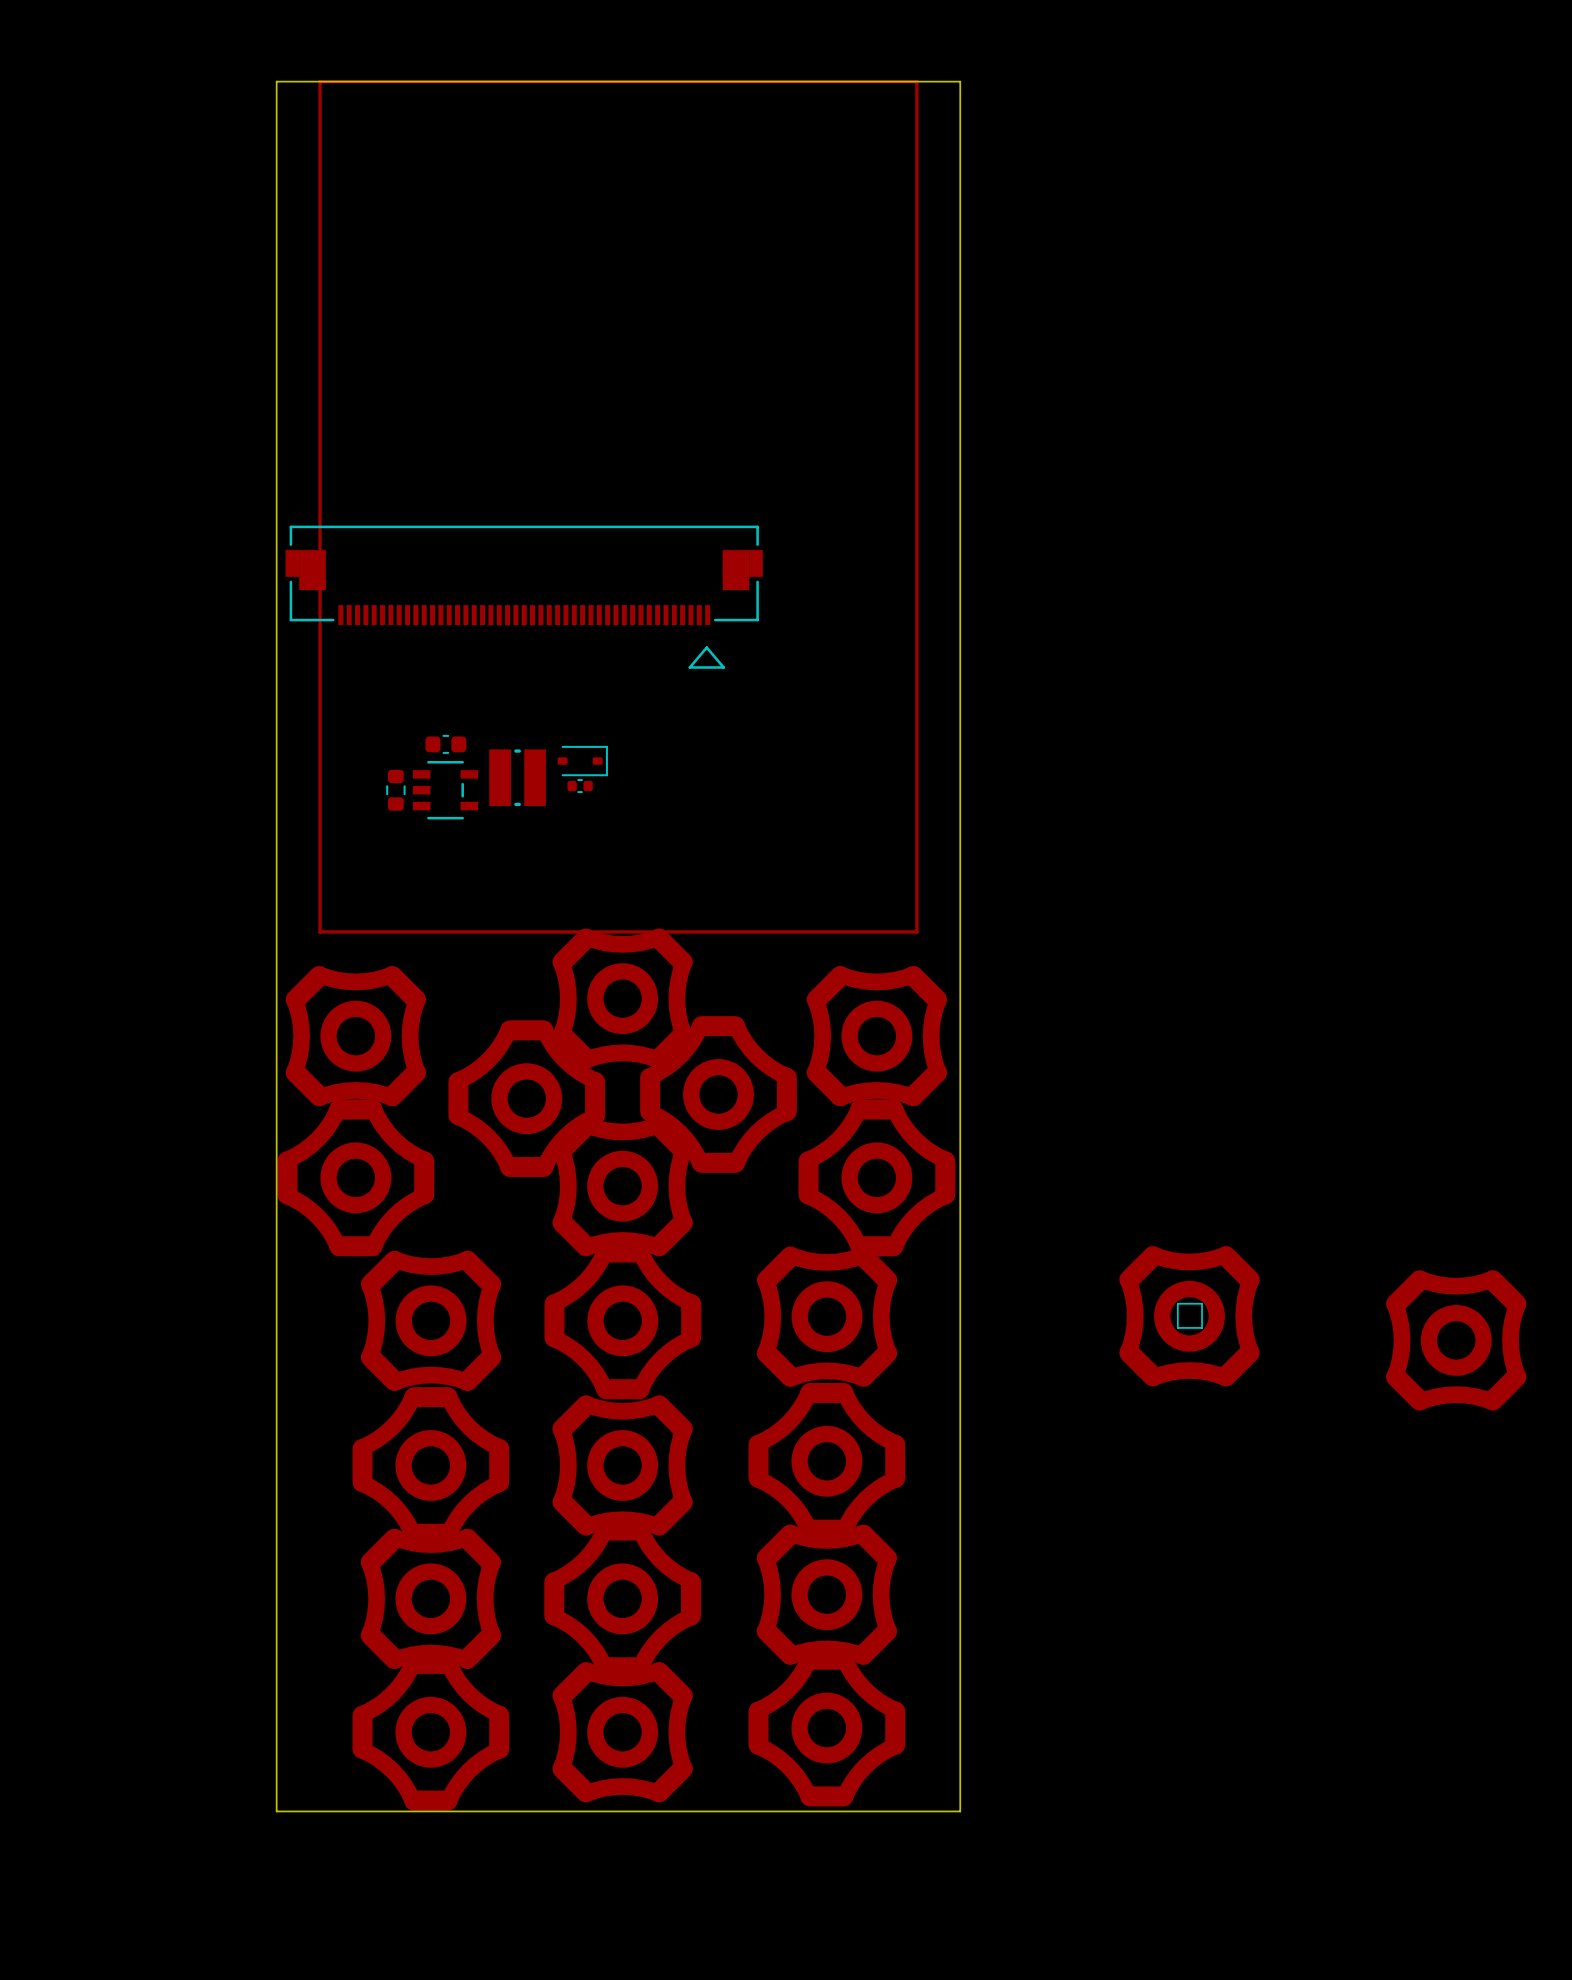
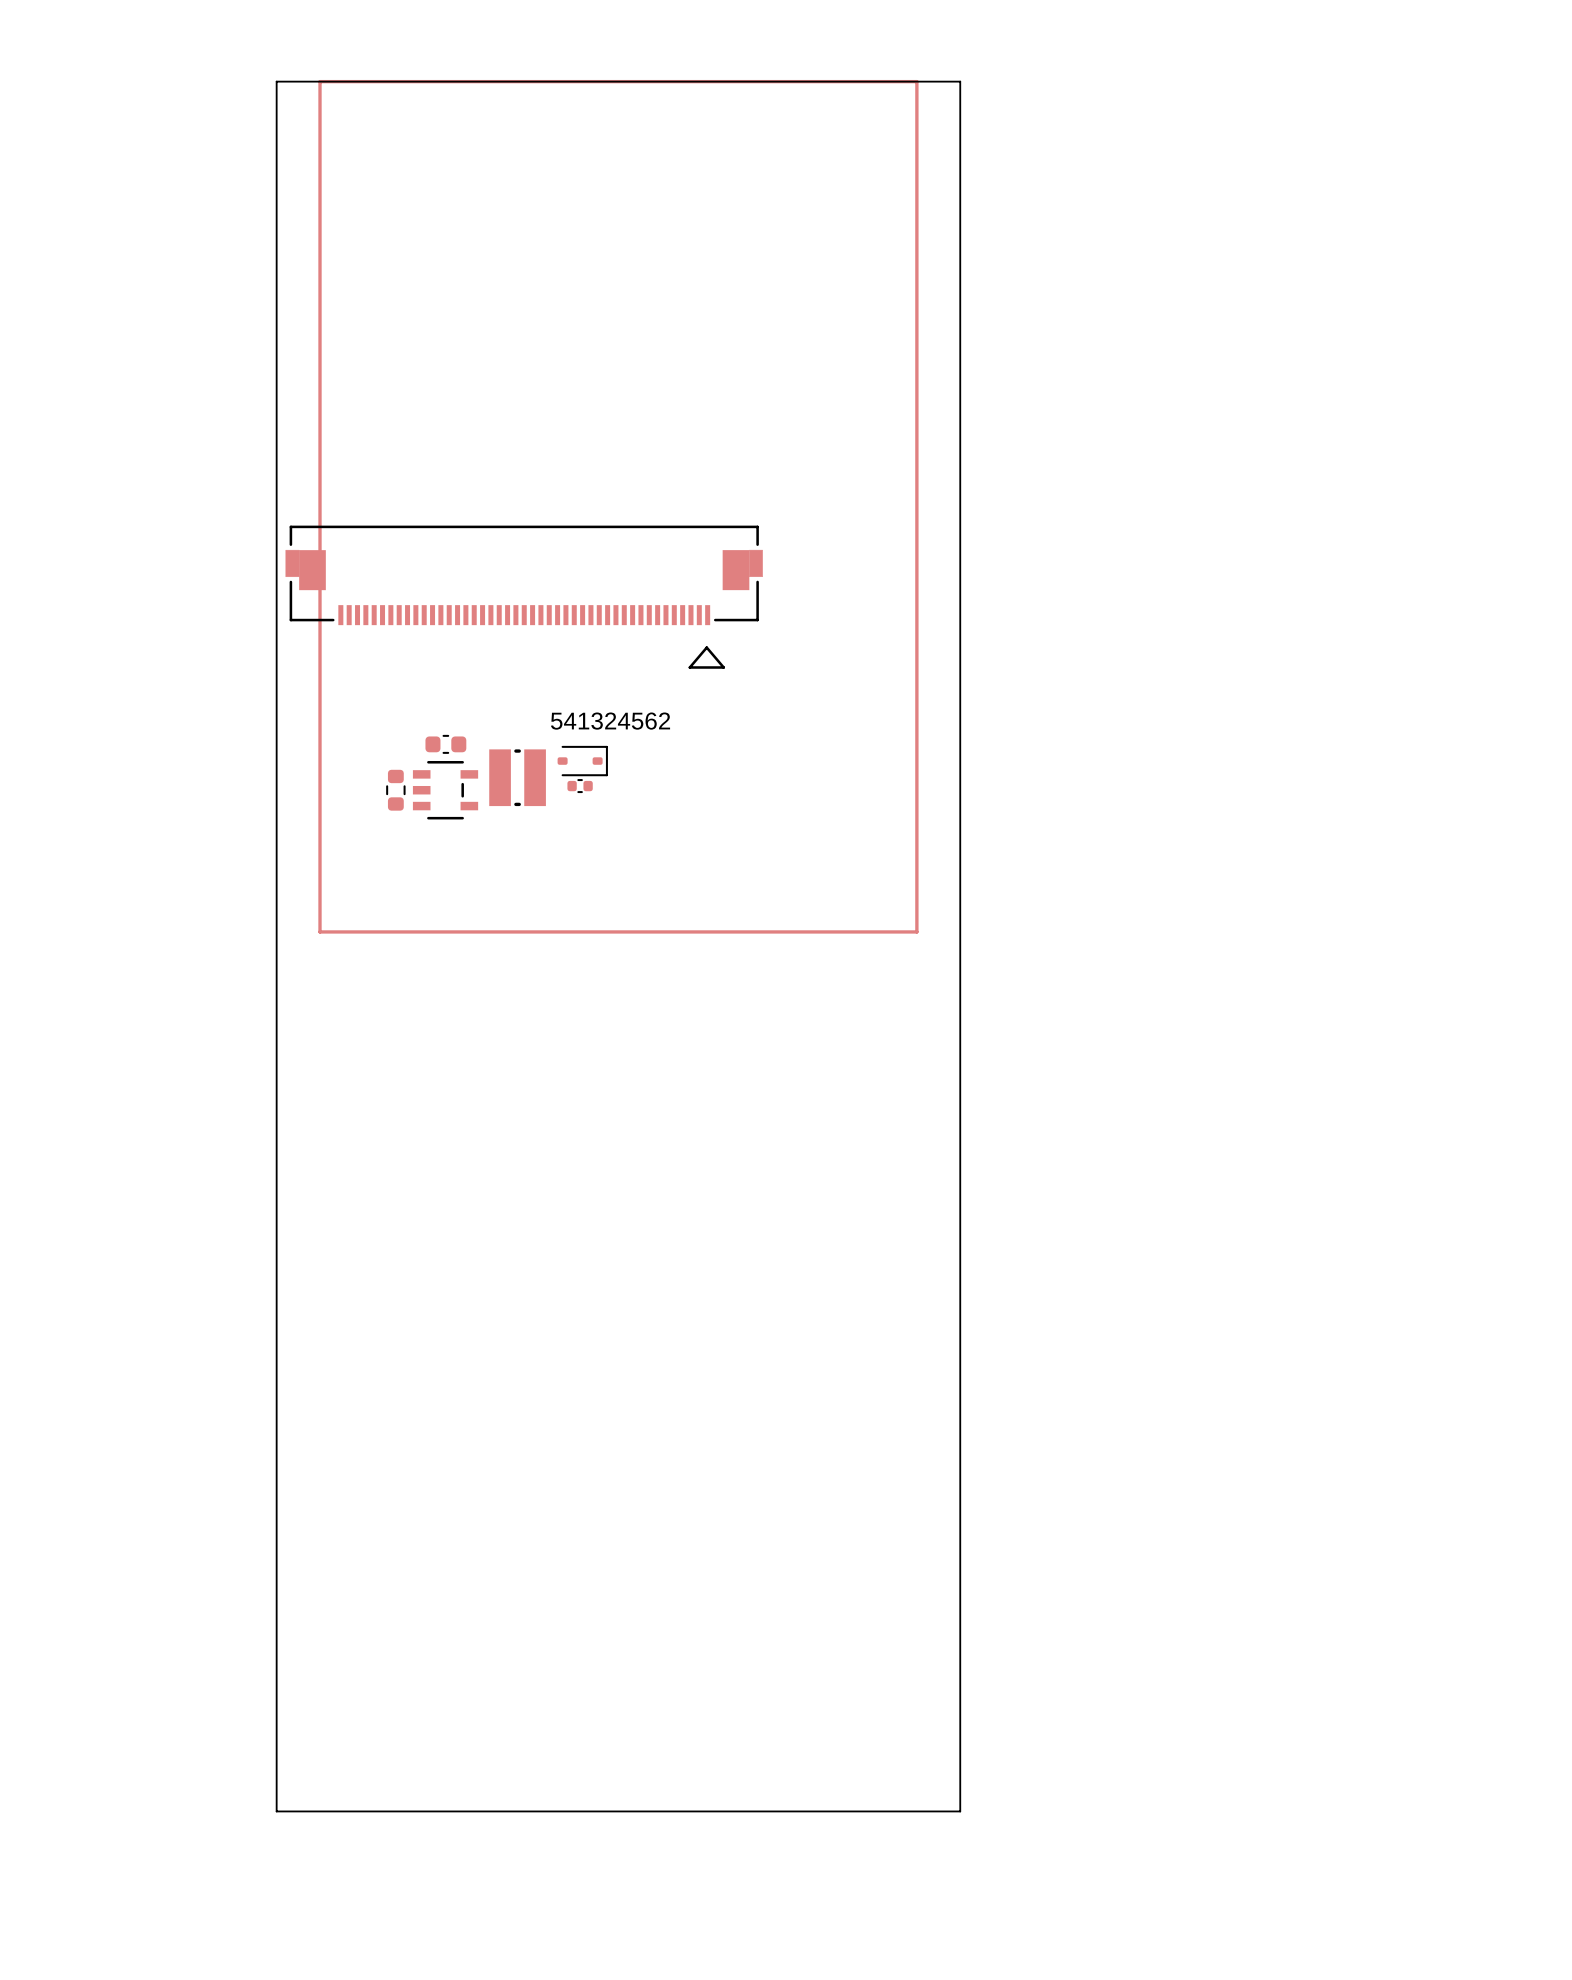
part footprint: [285, 525, 763, 669] -> [285, 525, 763, 669]
drawing: [277, 928, 956, 1811] -> none
drawing: [1119, 1246, 1260, 1387] -> none
drawing: [1386, 1270, 1527, 1411] -> none
line: (1177, 1303) (1202, 1303) (1202, 1327) (1177, 1327) (1177, 1303) -> none

